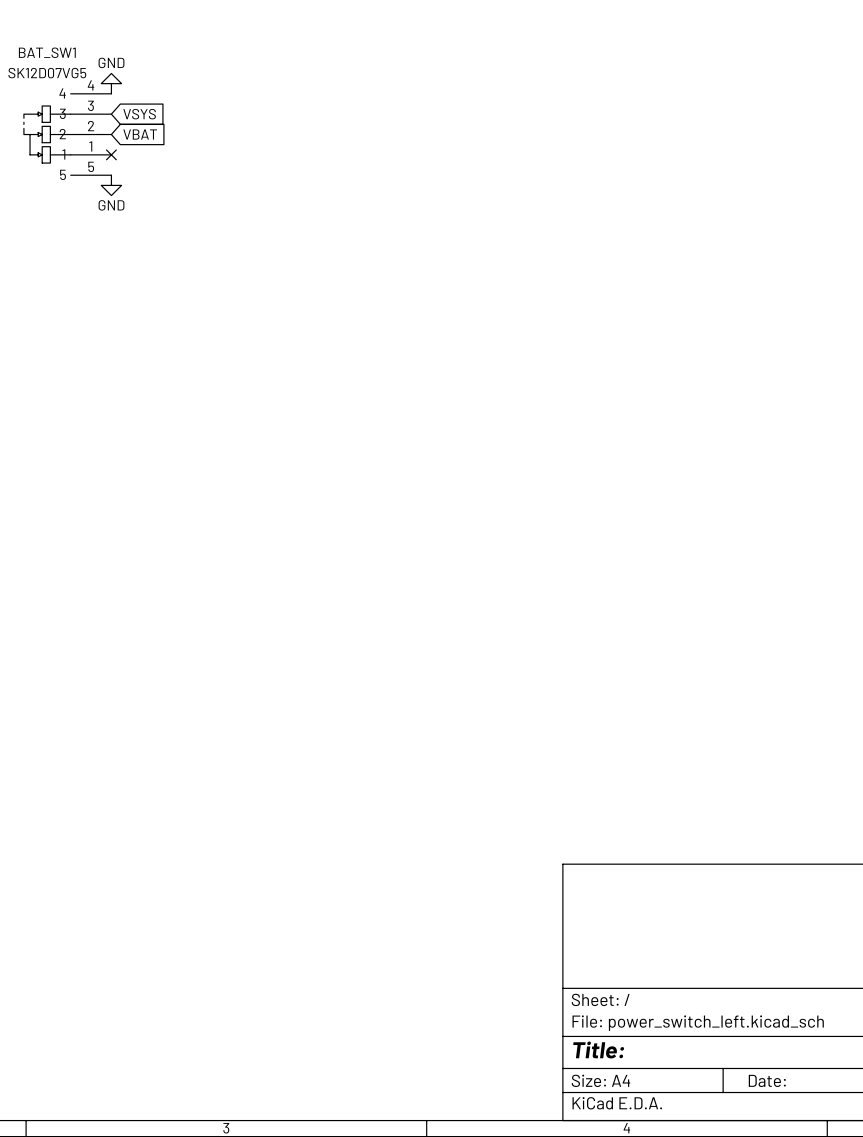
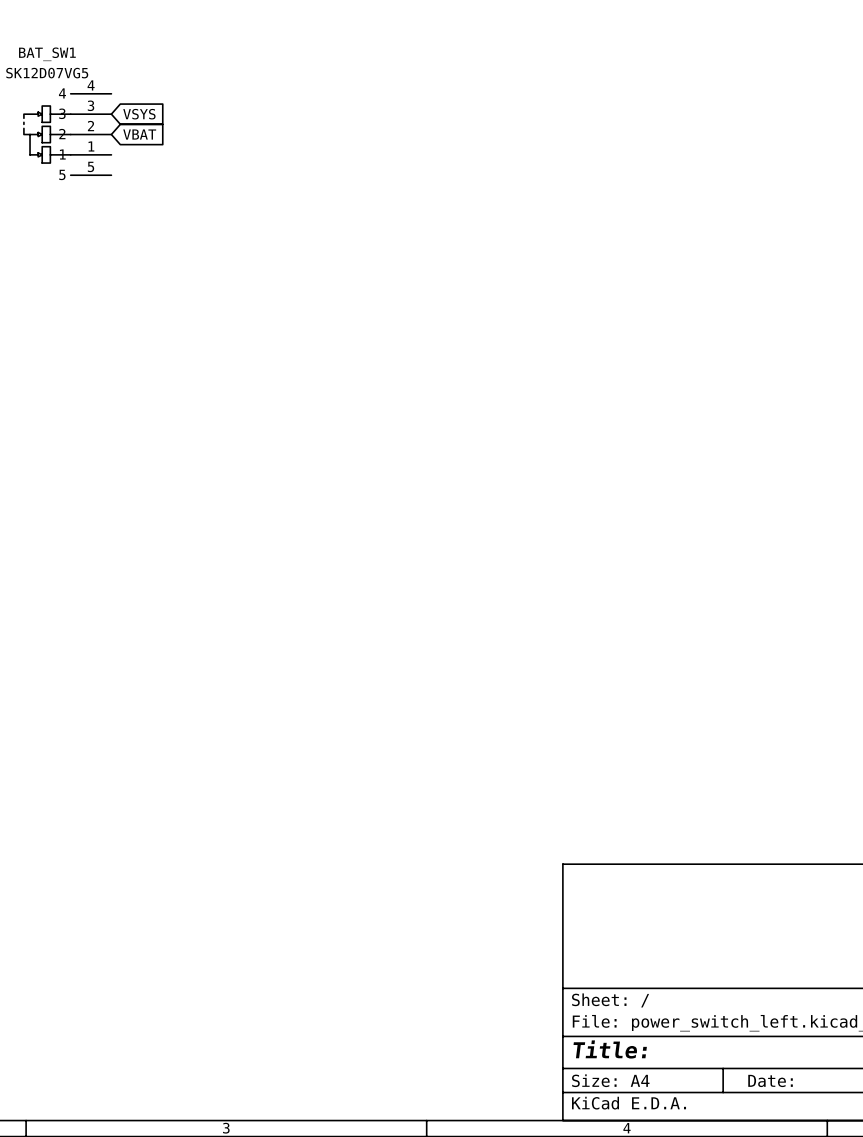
power symbol: GND (111, 83) -> none
no-connect mark: (111, 154) -> none
power symbol: GND (111, 185) -> none

